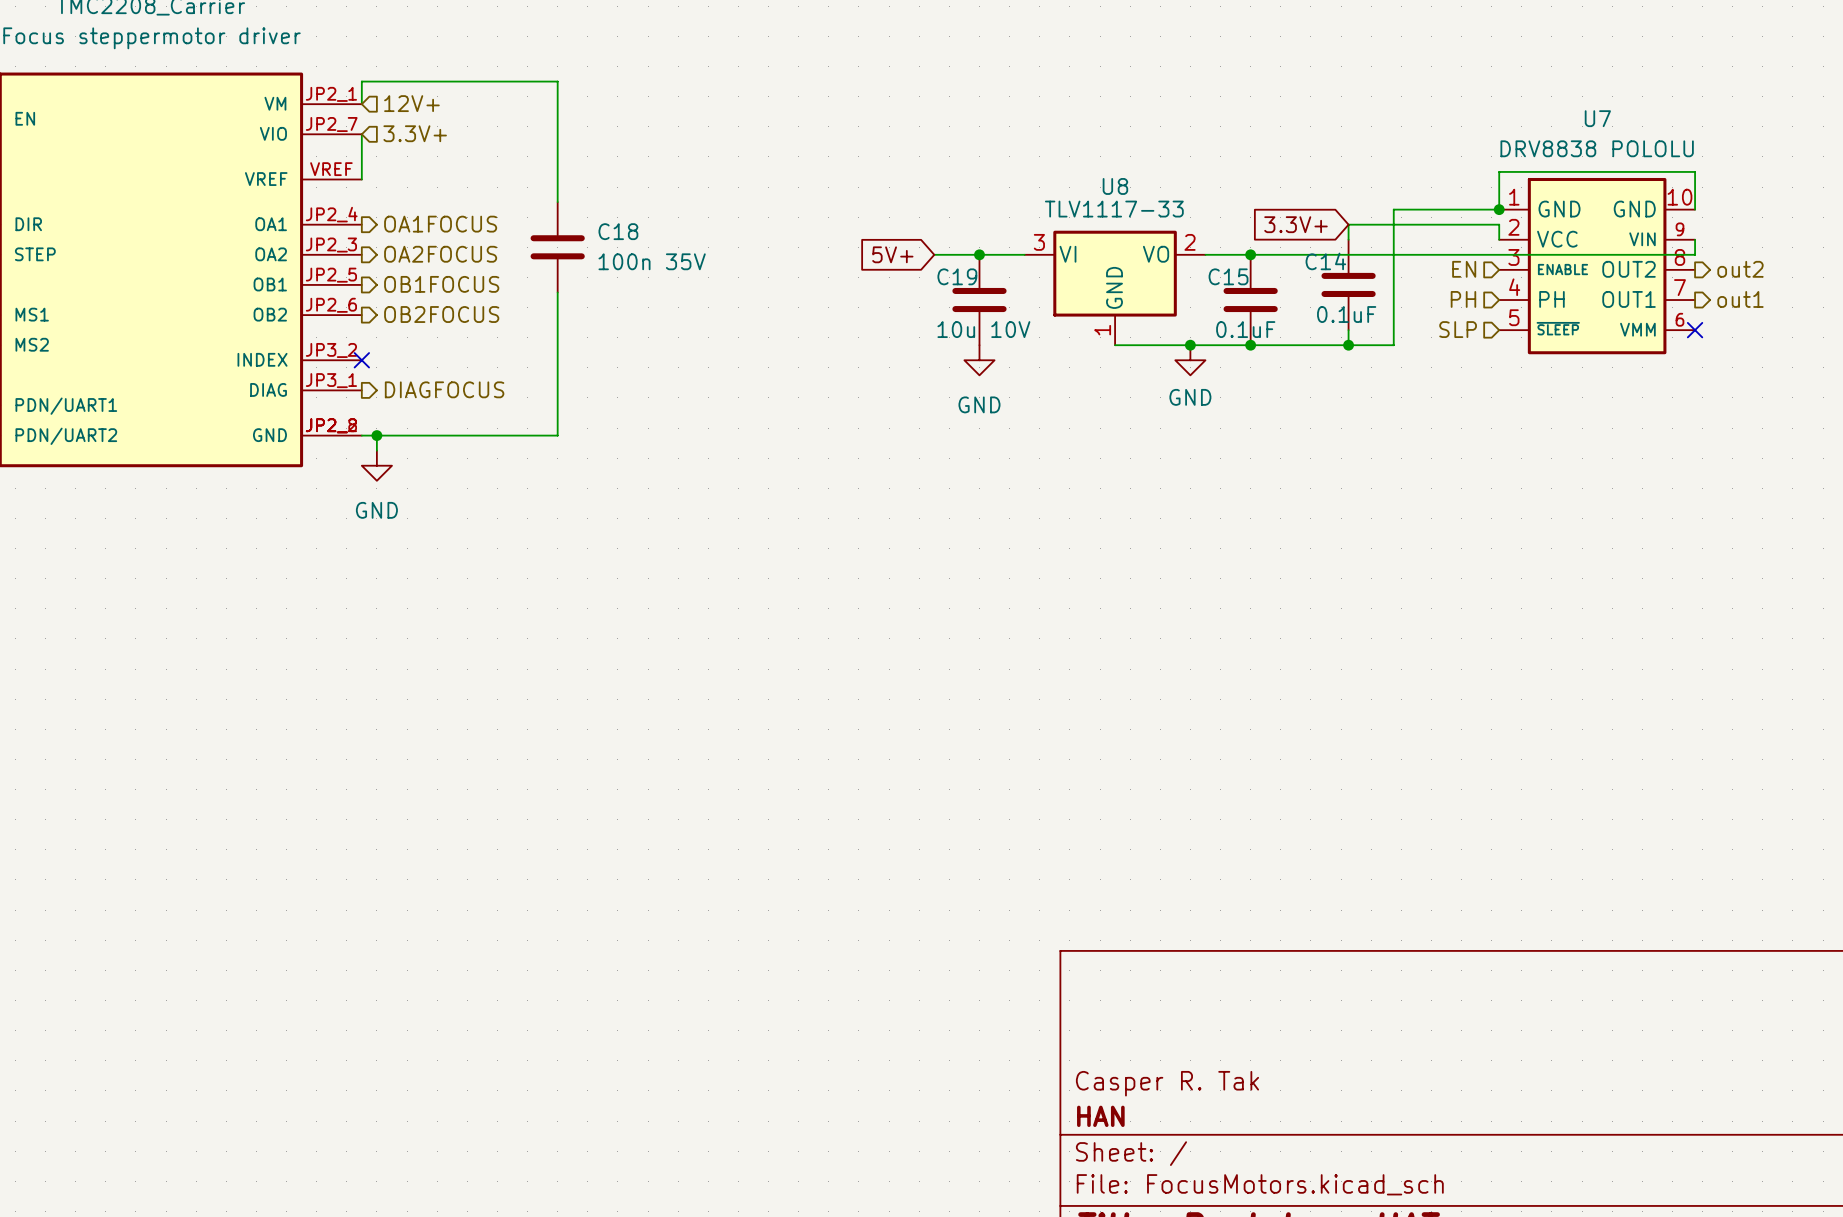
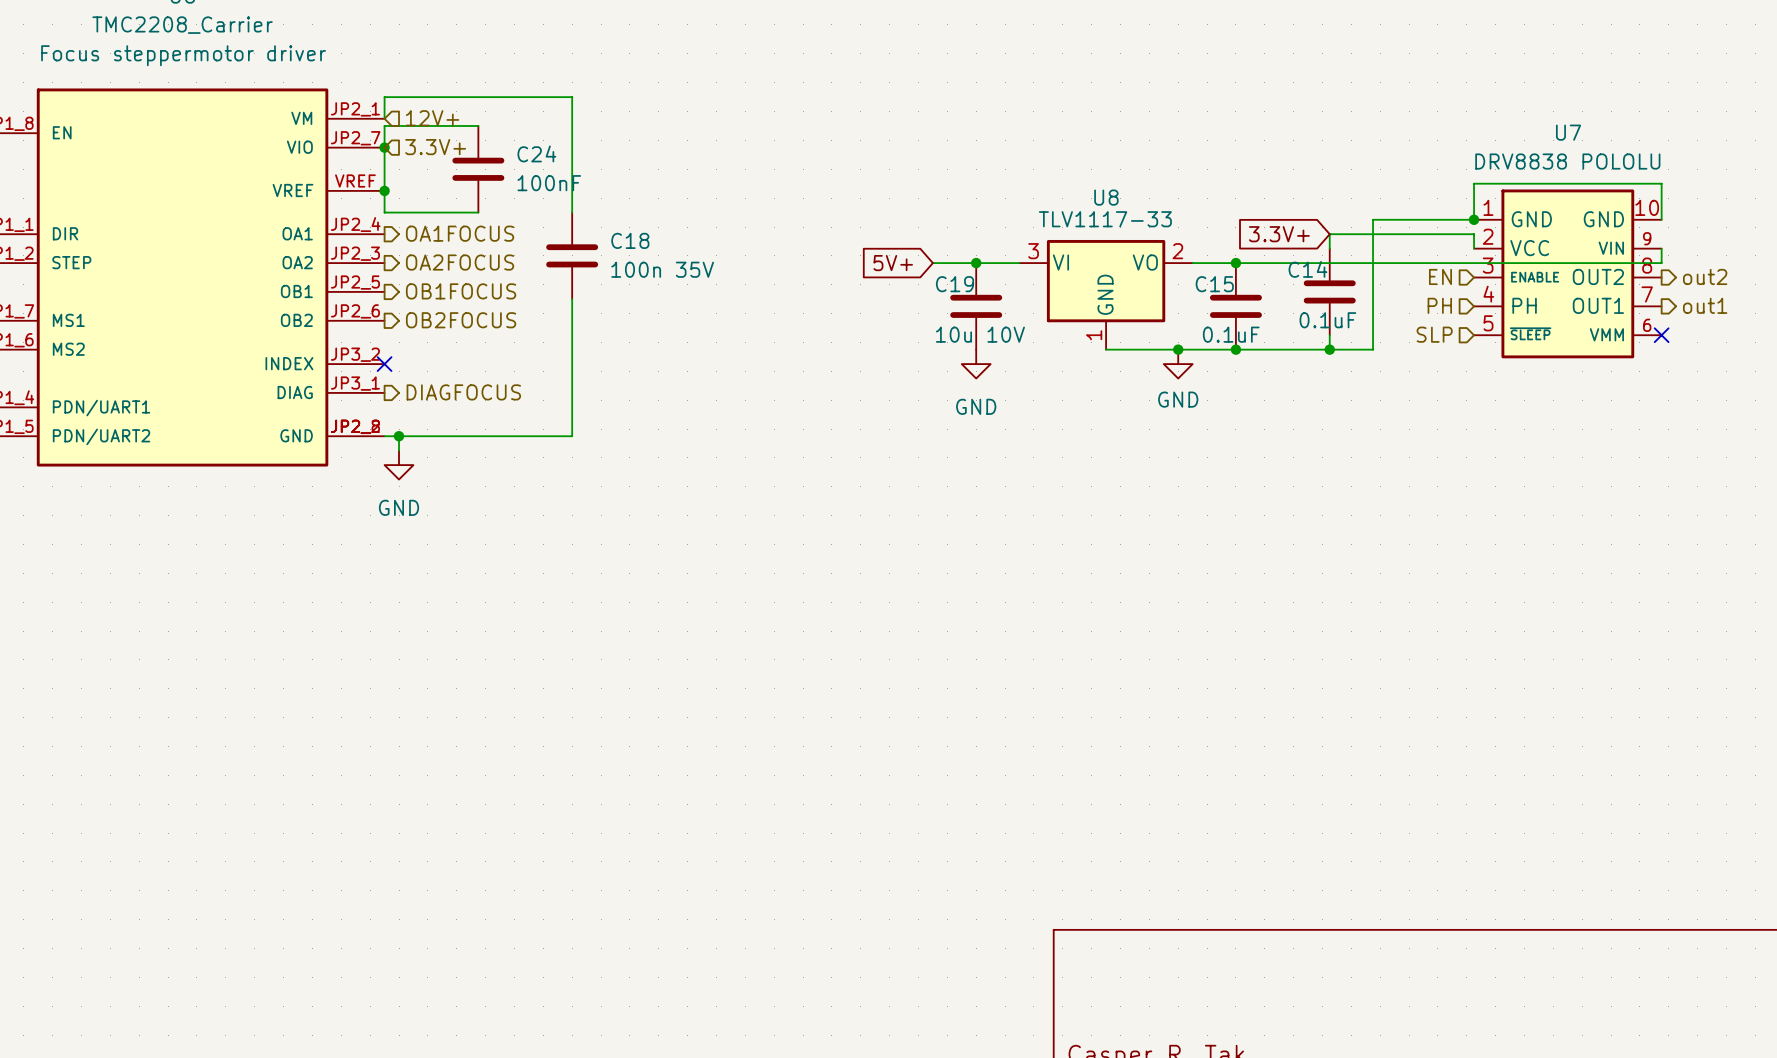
wire: none -> (478, 125) (384, 125) (384, 147)
junction: none -> (384, 147)
C24: none -> 100nF (478, 169)
wire: none -> (384, 190) (384, 212) (478, 212)
junction: none -> (384, 190)

